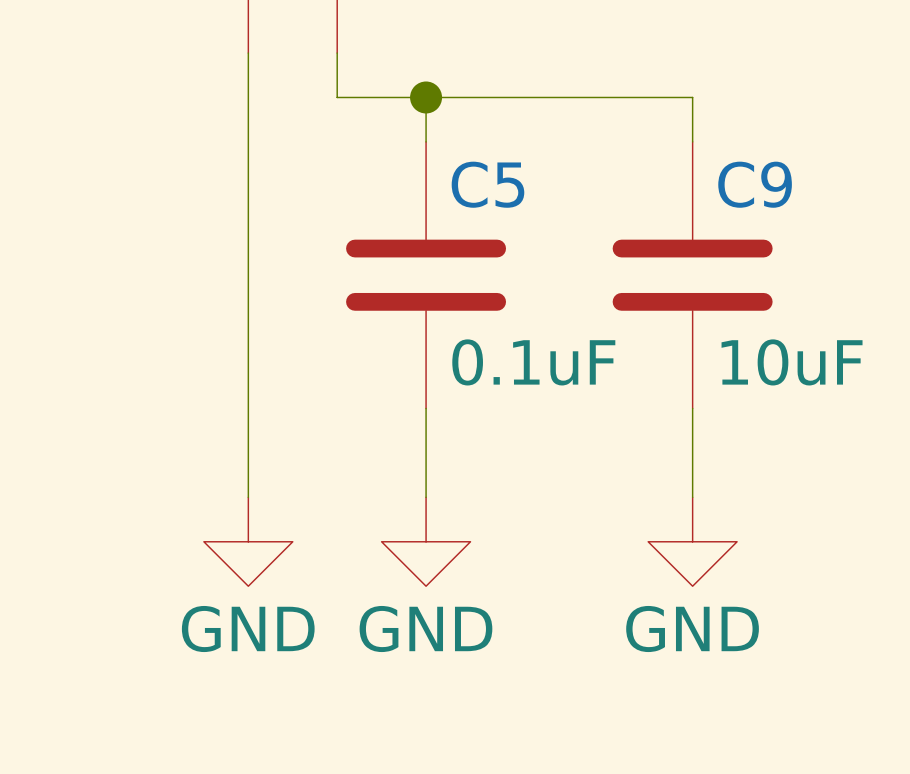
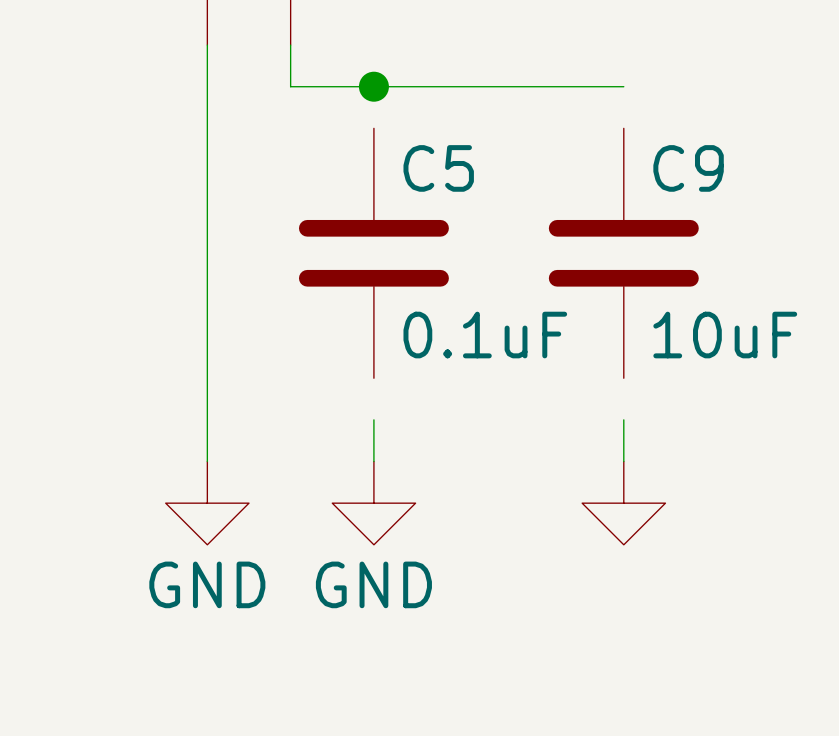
wire: (426, 97) (426, 141) -> none
wire: (692, 97) (692, 141) -> none
wire: (426, 408) (426, 452) -> none
wire: (692, 408) (692, 452) -> none
power symbol text: GND (692, 629) -> none

